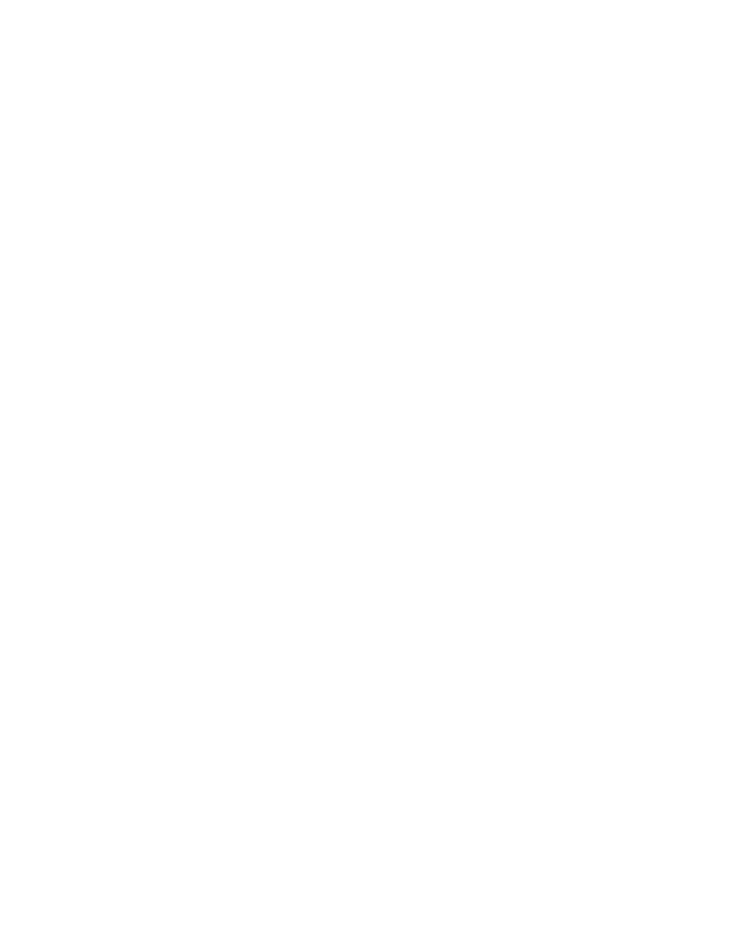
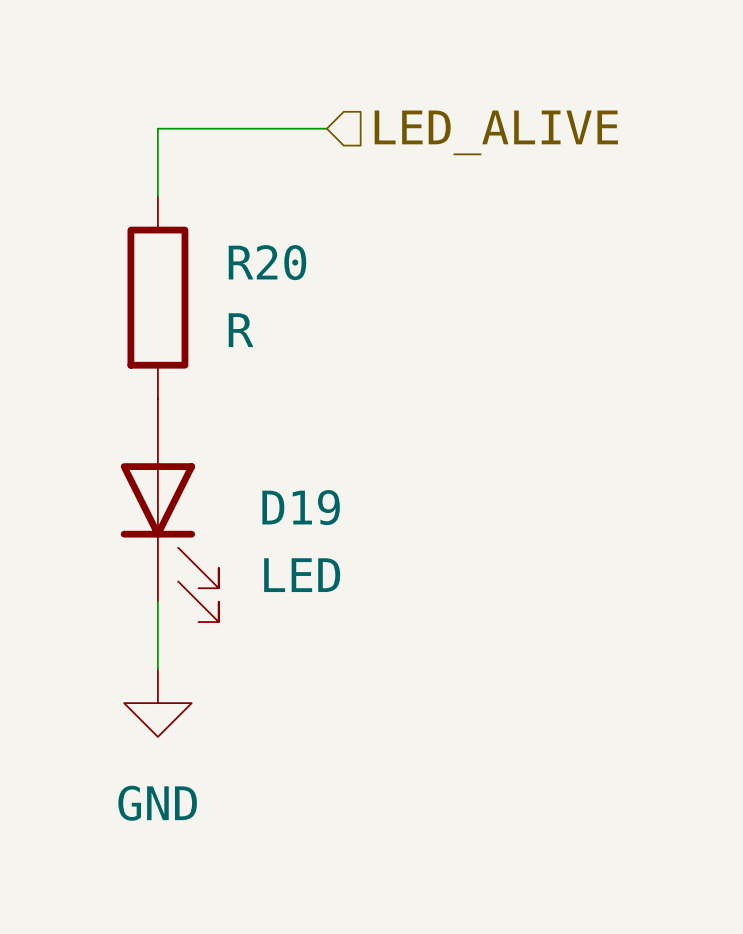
wire: none -> (326, 128) (157, 128) (157, 196)
hierarchical label: none -> LED_ALIVE (496, 132)
R20: none -> R (157, 297)
D19: none -> LED (169, 510)
wire: none -> (157, 601) (157, 669)
power symbol: none -> GND (157, 703)

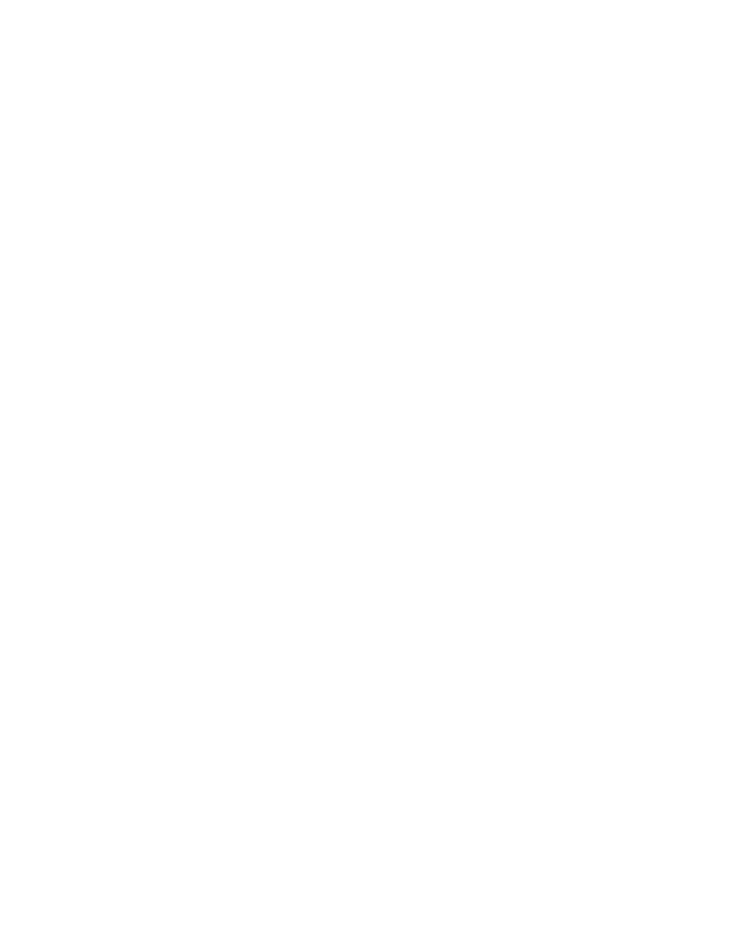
wire: (326, 128) (157, 128) (157, 196) -> none
hierarchical label: LED_ALIVE (496, 132) -> none
R20: R (157, 297) -> none
D19: LED (169, 510) -> none
wire: (157, 601) (157, 669) -> none
power symbol: GND (157, 703) -> none

